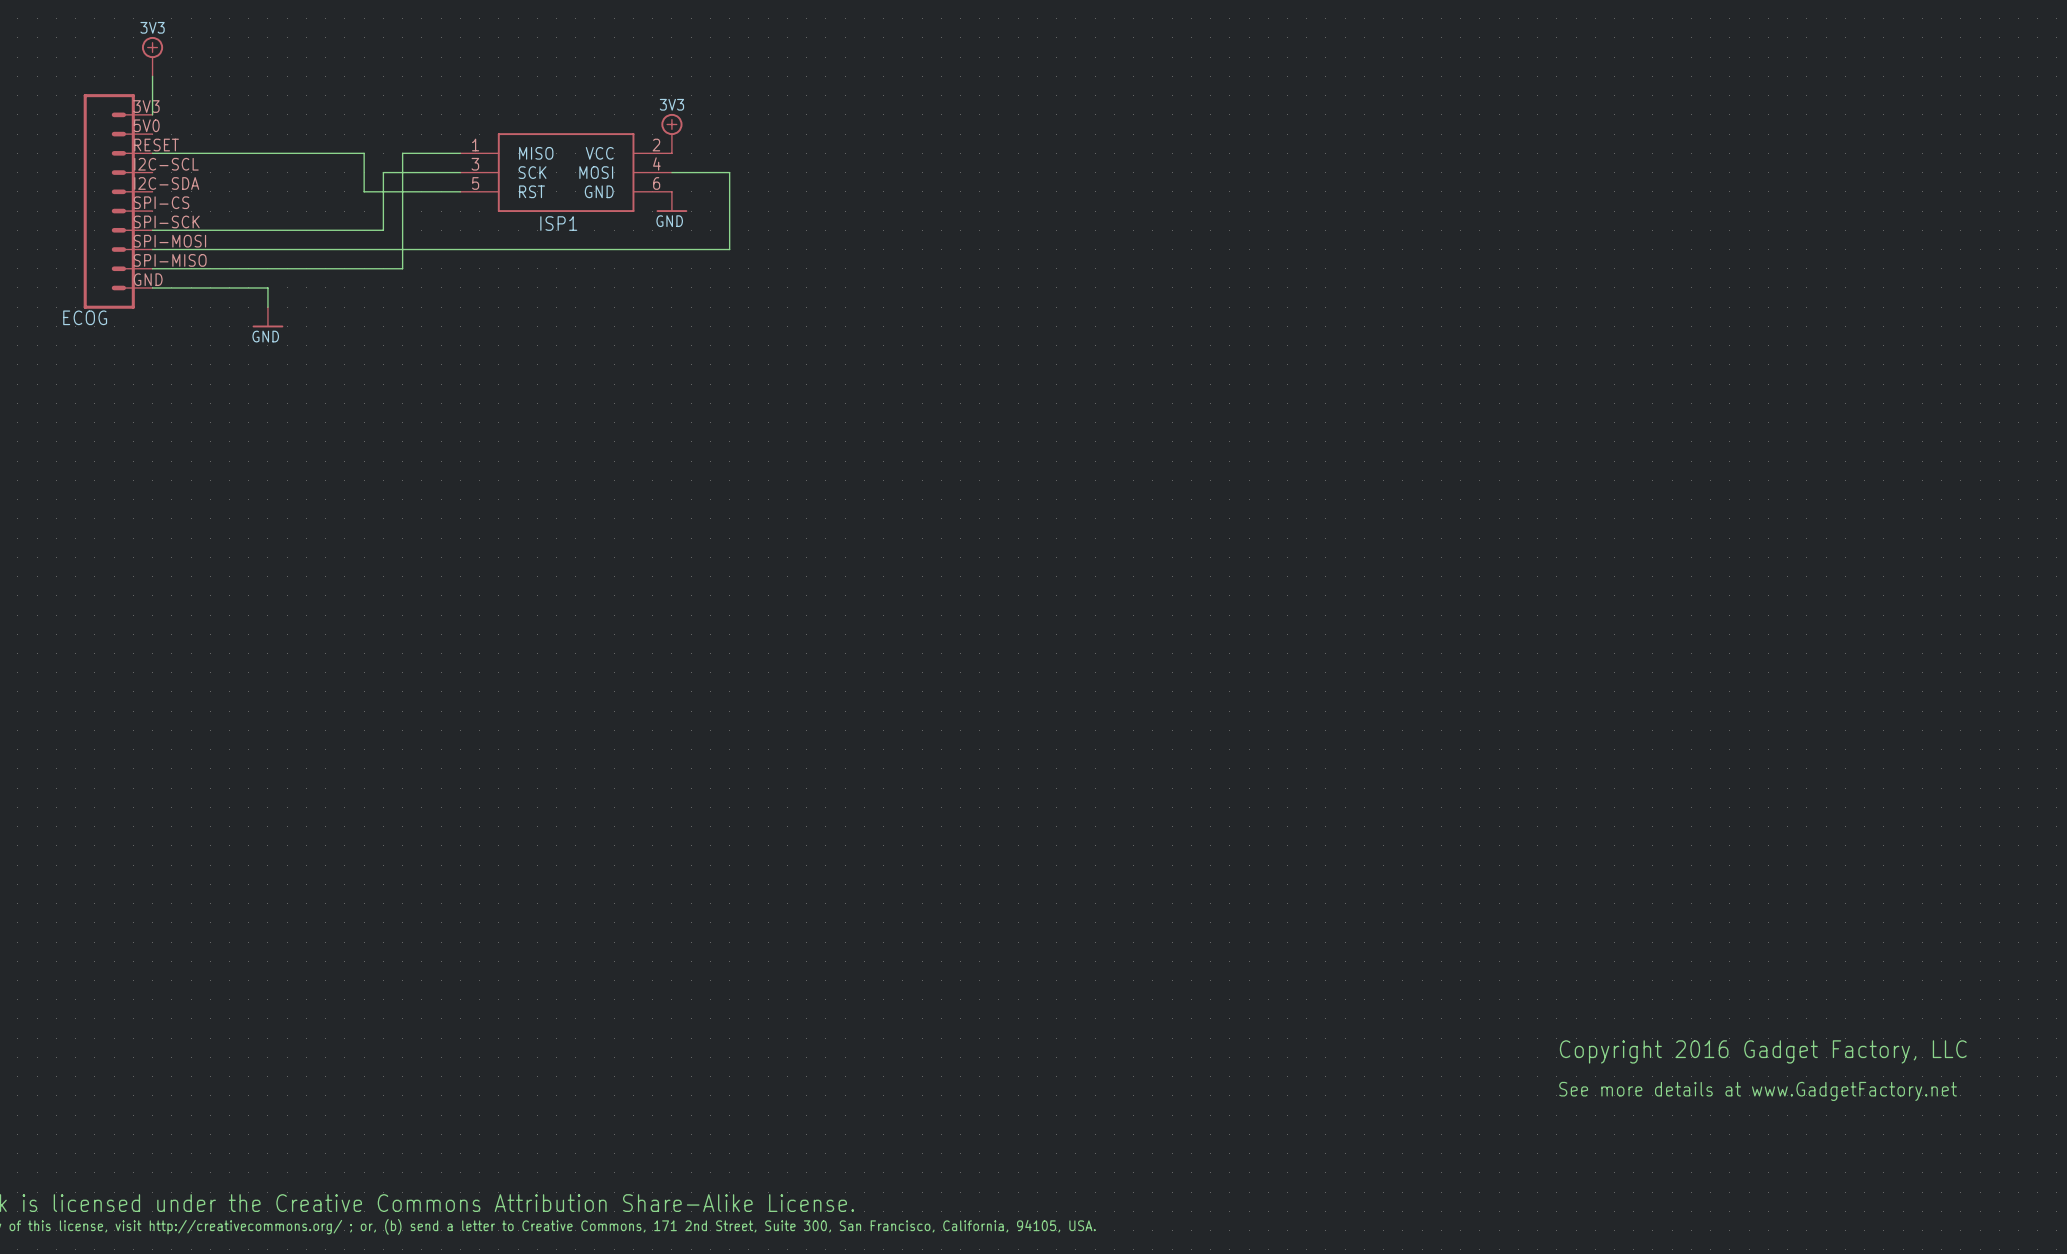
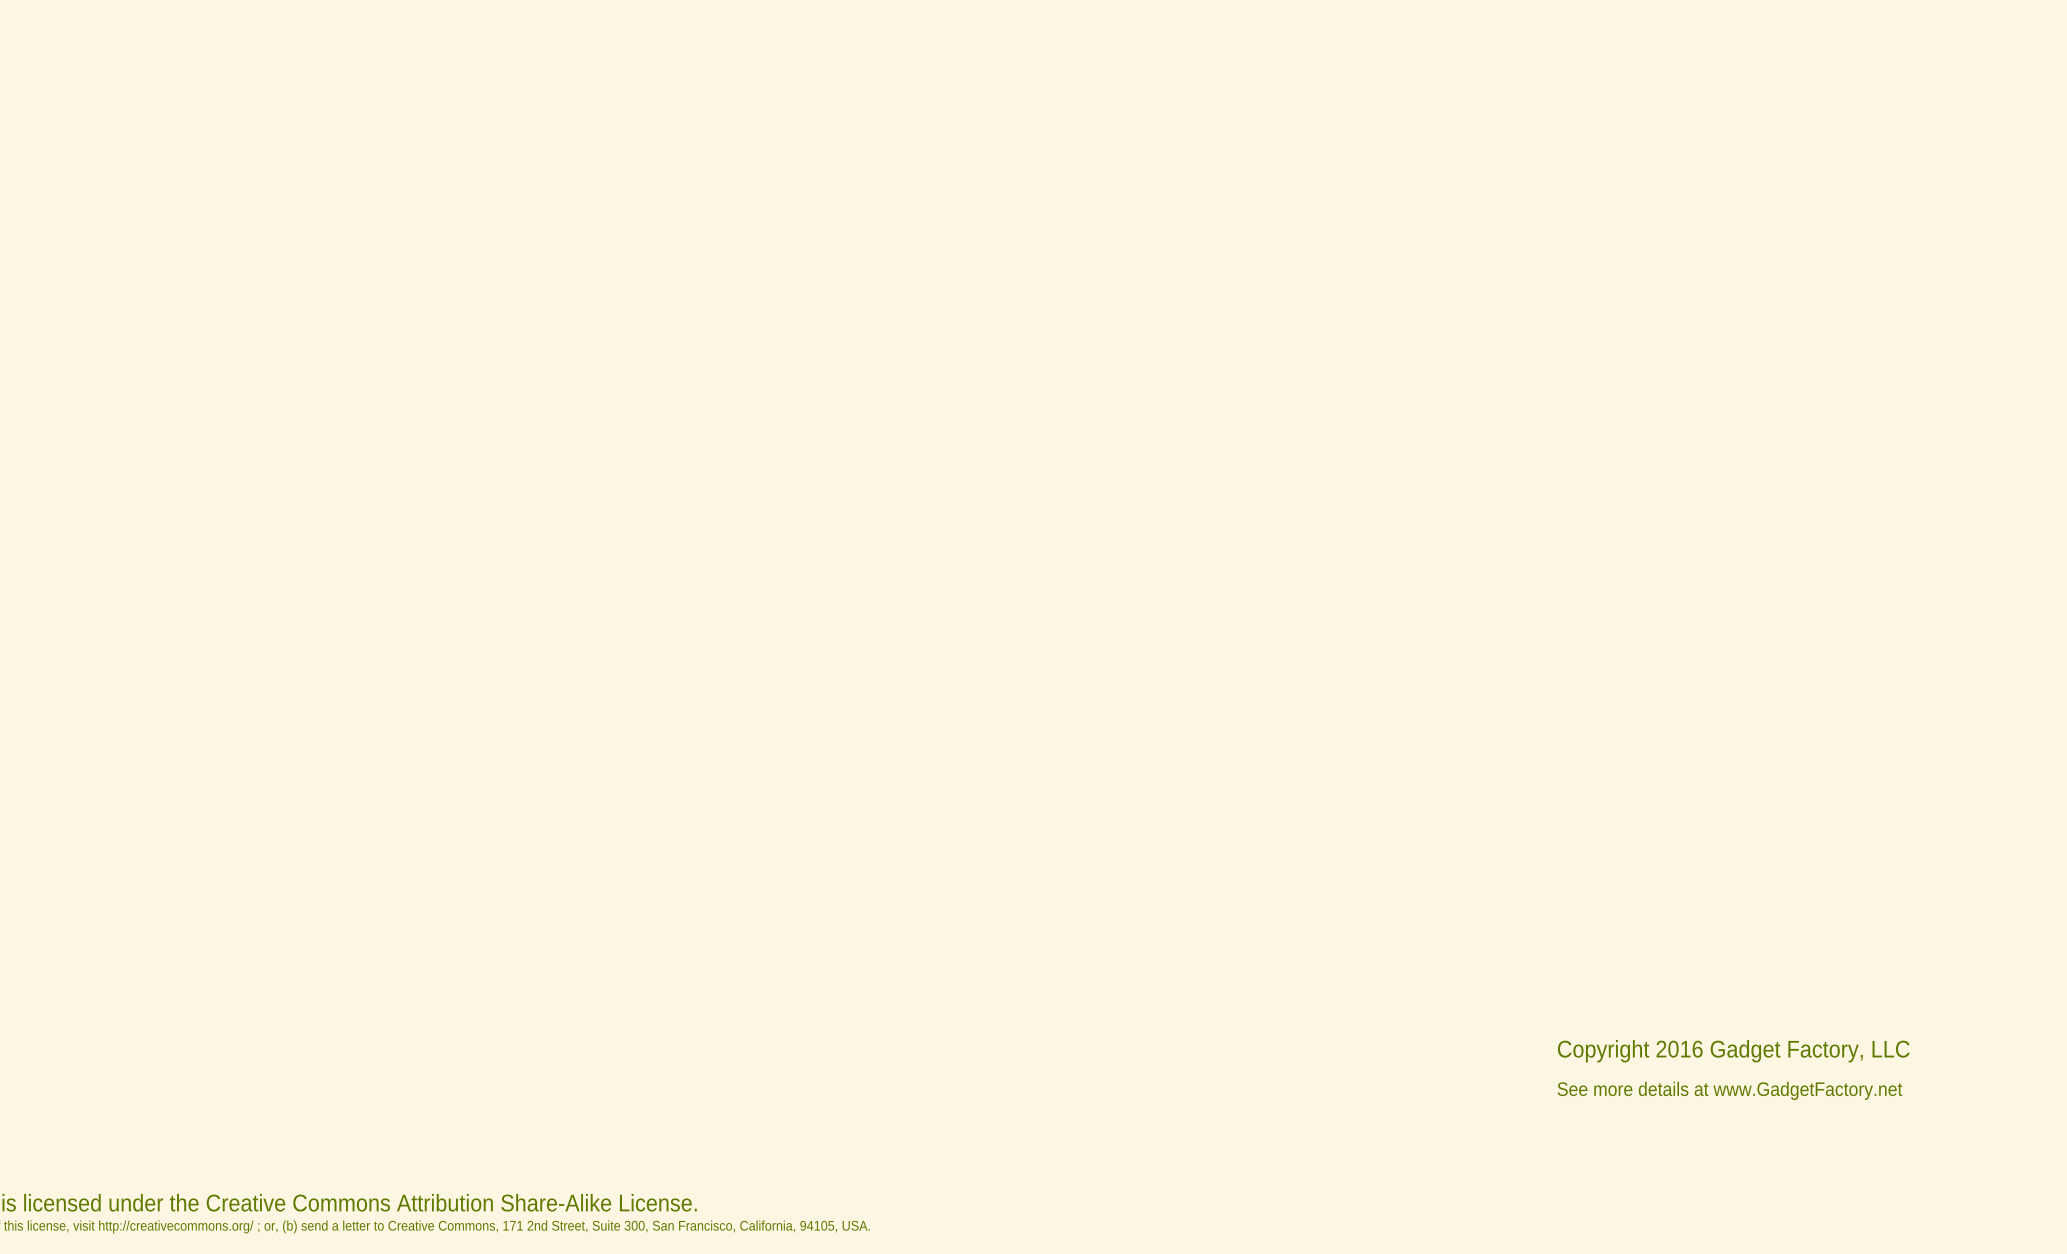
power symbol: 3V3 (152, 56) -> none
wire: (152, 76) (152, 114) -> none
power symbol: 3V3 (671, 133) -> none
wire: (152, 153) (364, 153) (364, 191) (460, 191) -> none
wire: (460, 153) (402, 153) (402, 268) (152, 268) -> none
wire: (460, 172) (383, 172) (383, 230) (152, 230) -> none
ISP1: (566, 172) -> none
wire: (671, 172) (729, 172) (729, 249) (152, 249) -> none
ECOG: (118, 201) -> none
power symbol: GND (671, 201) -> none
wire: (152, 287) (267, 287) (267, 307) -> none
power symbol: GND (267, 317) -> none

